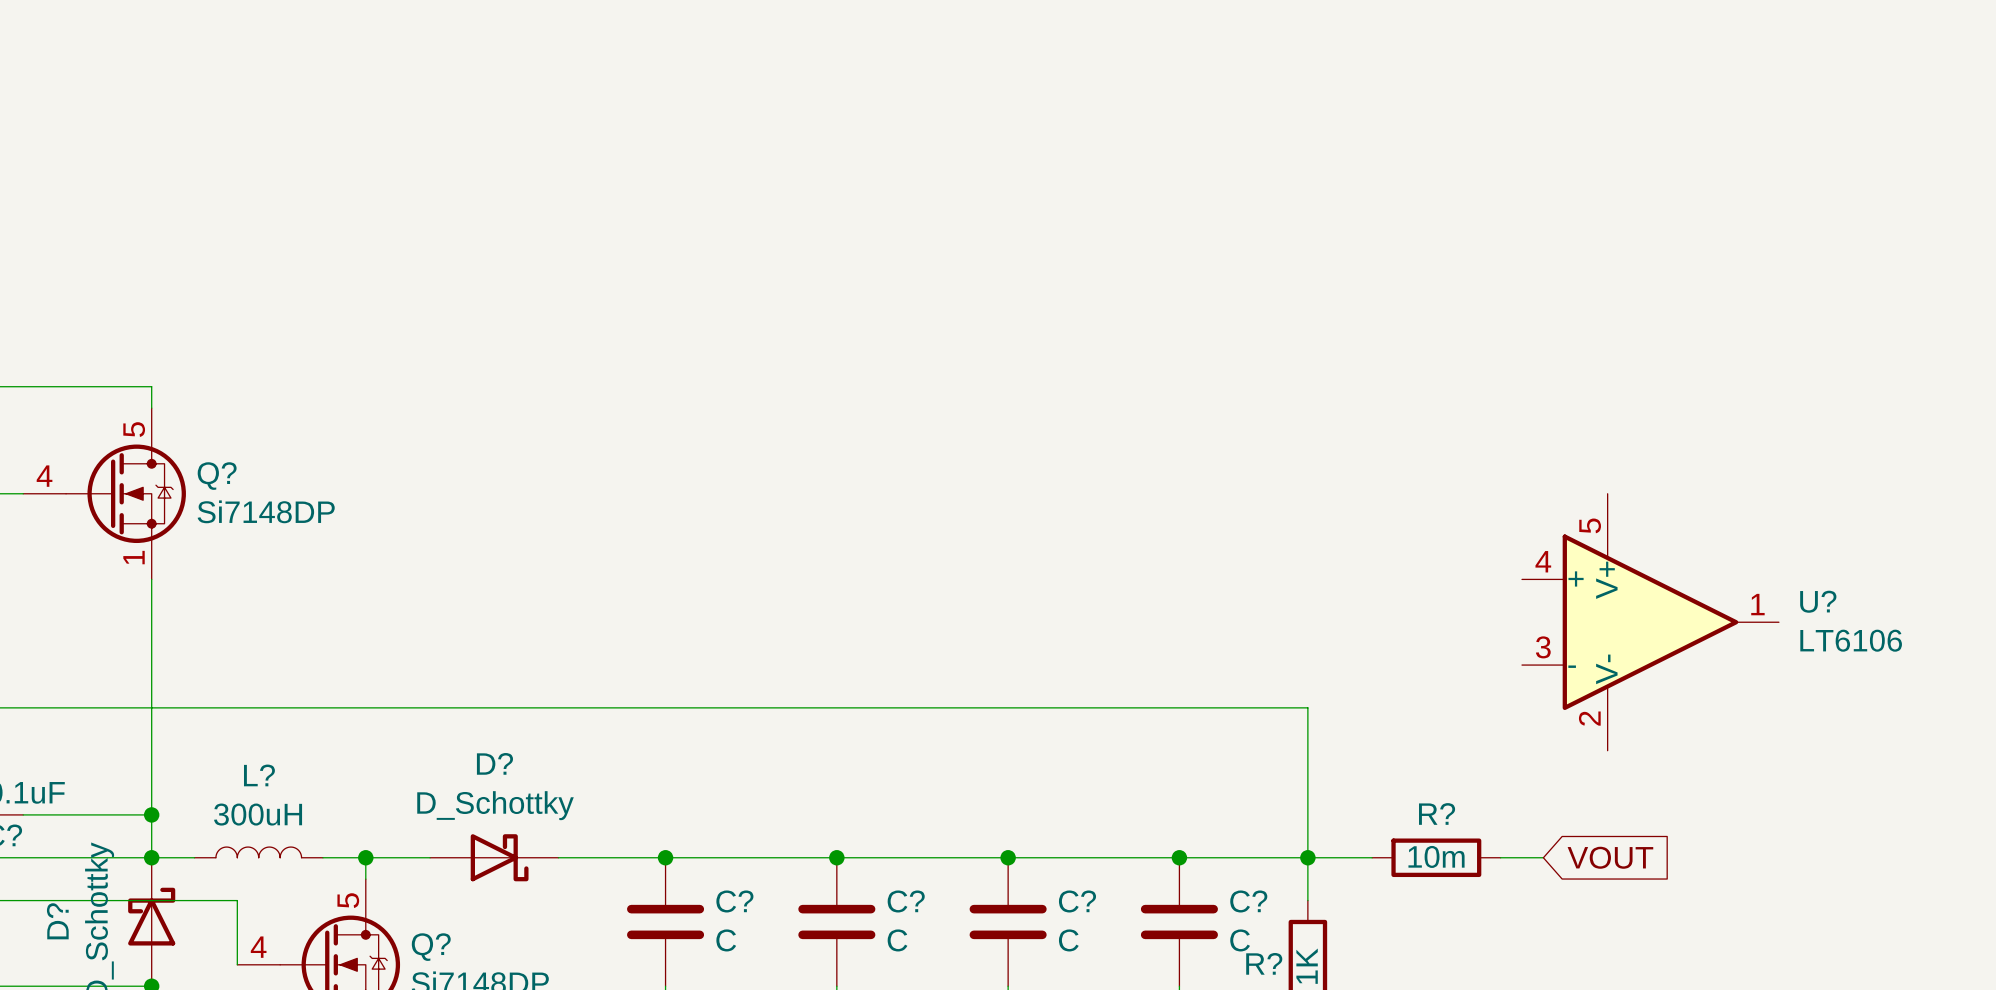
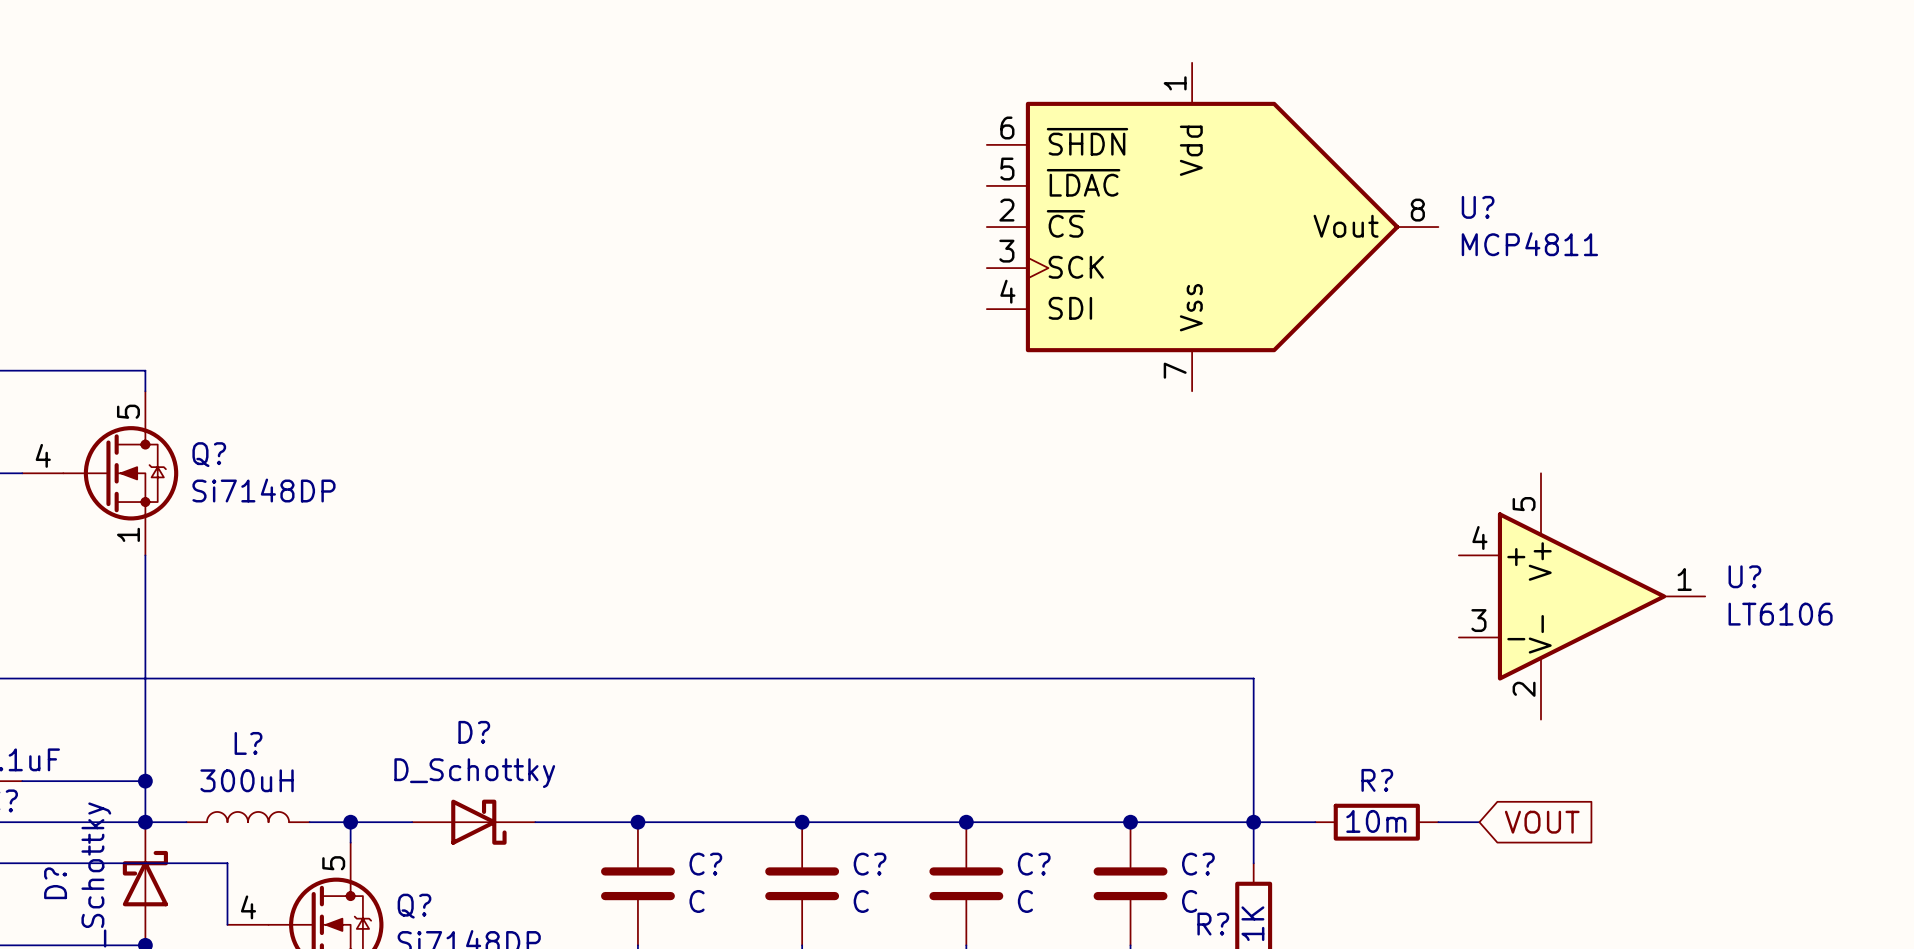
U?: none -> MCP4811 (1212, 227)

